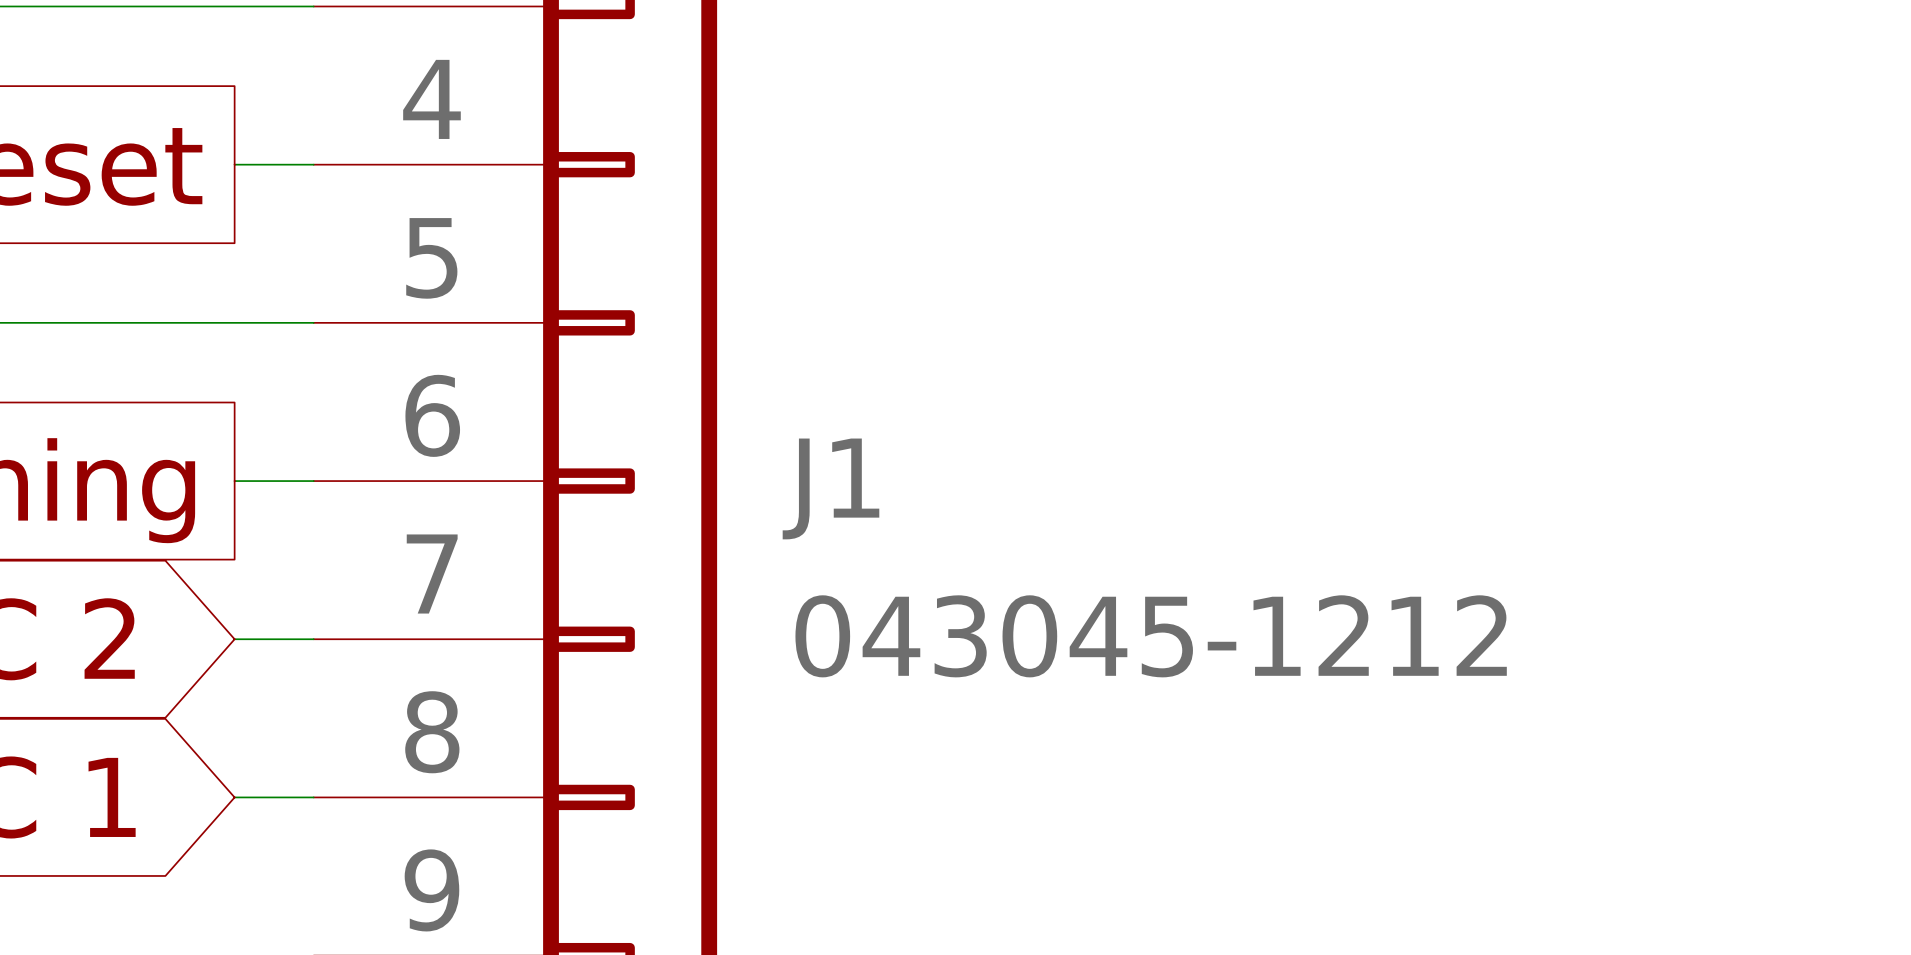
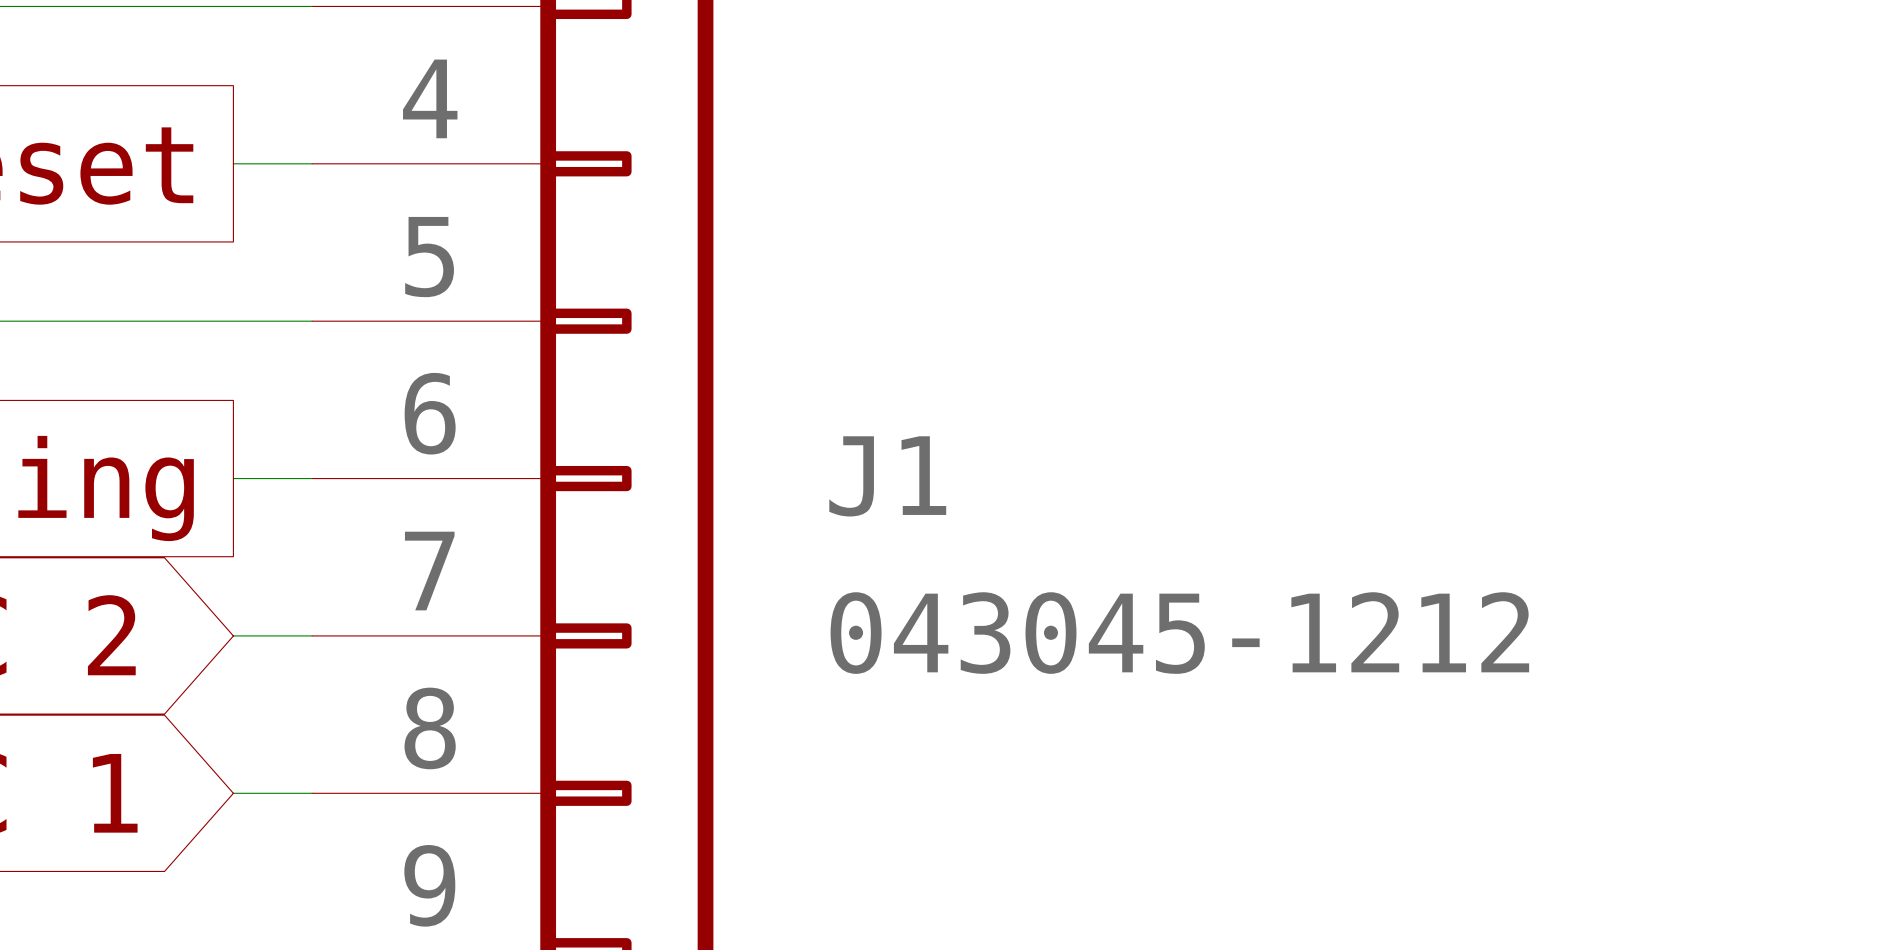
J1 name position: J1 (830, 488) -> J1 (887, 476)
J1 value position: 043045-1212 (1151, 636) -> 043045-1212 (1179, 633)

